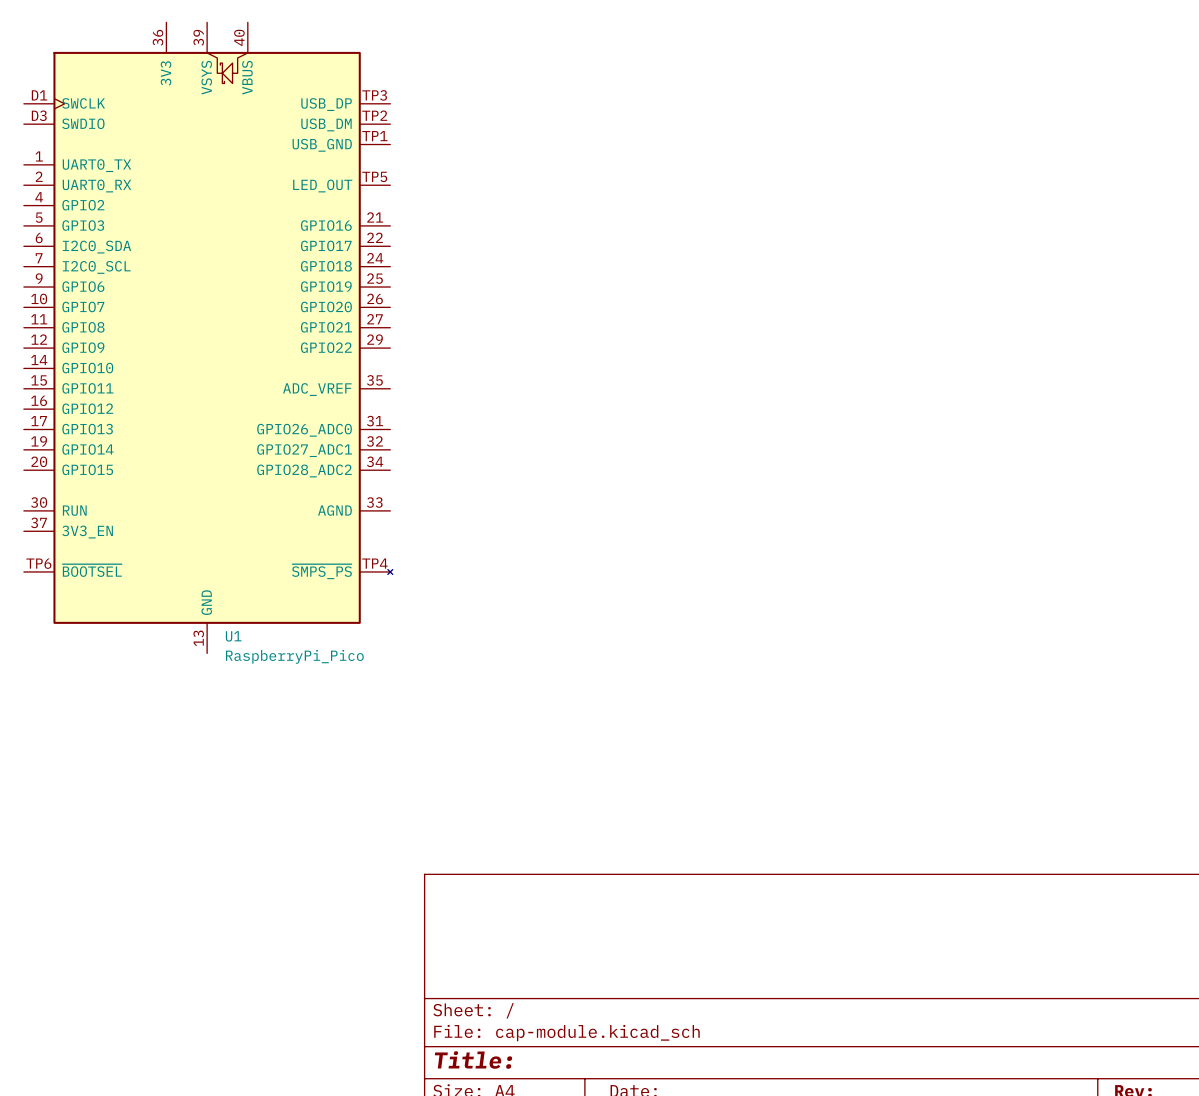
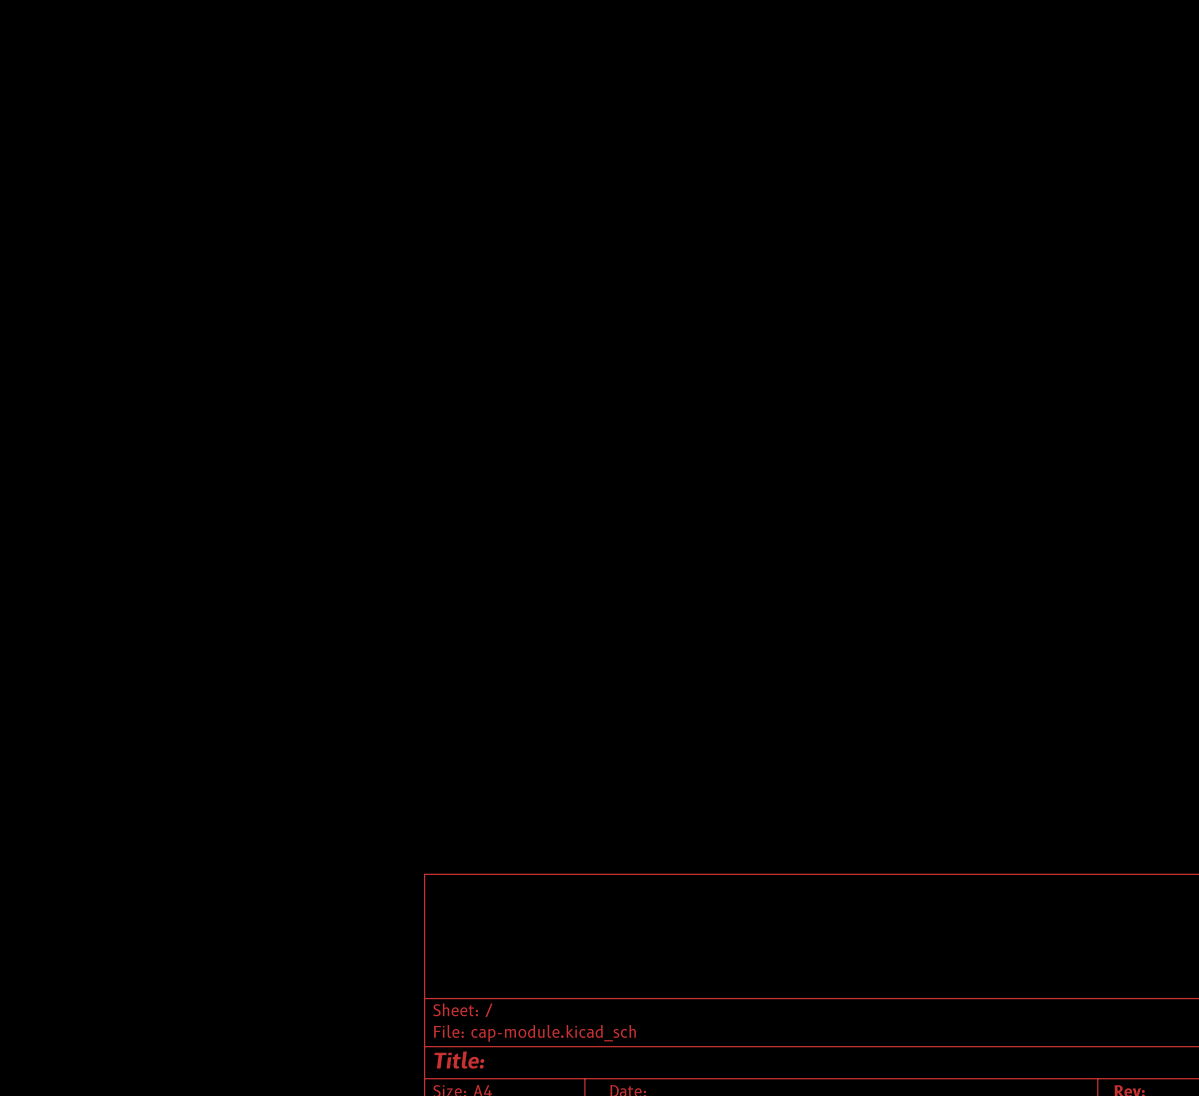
U1: RaspberryPi_Pico (208, 337) -> none

